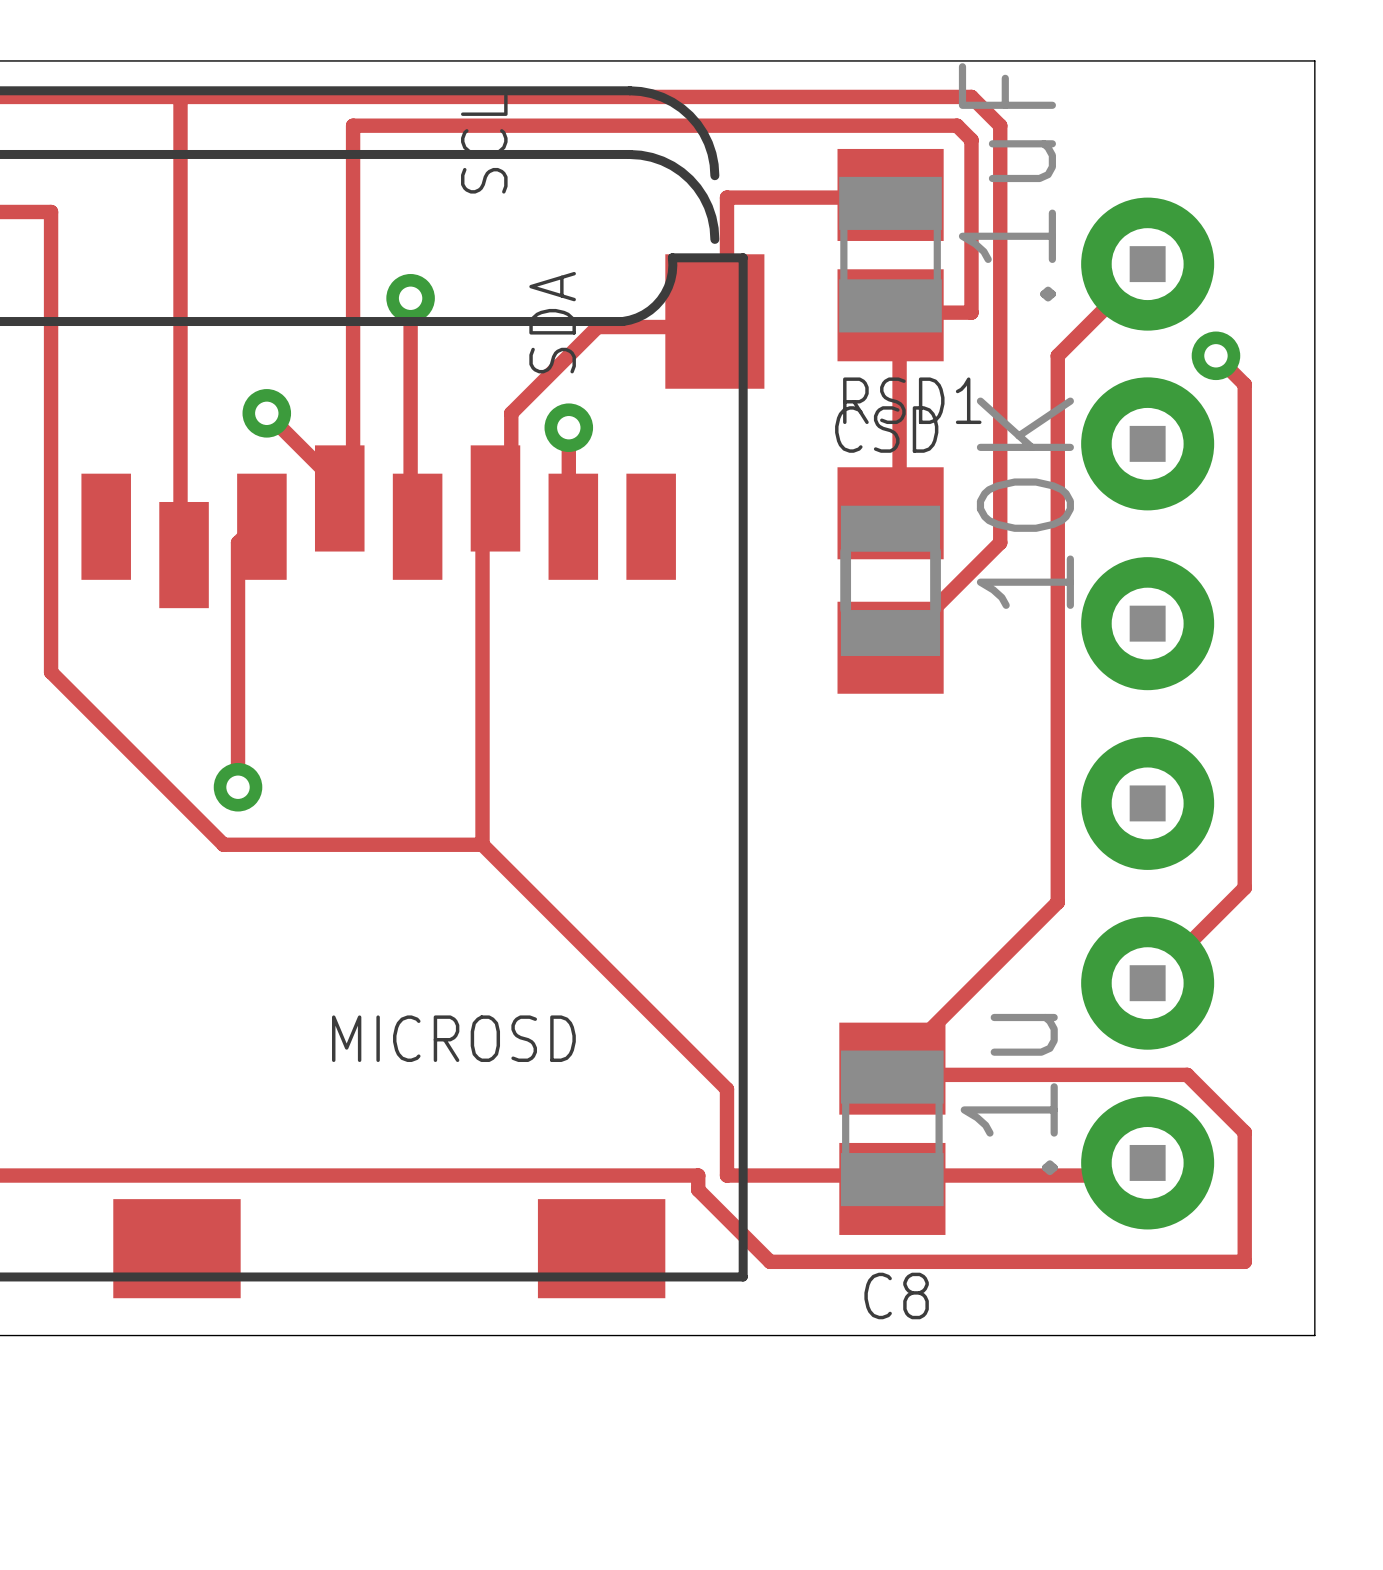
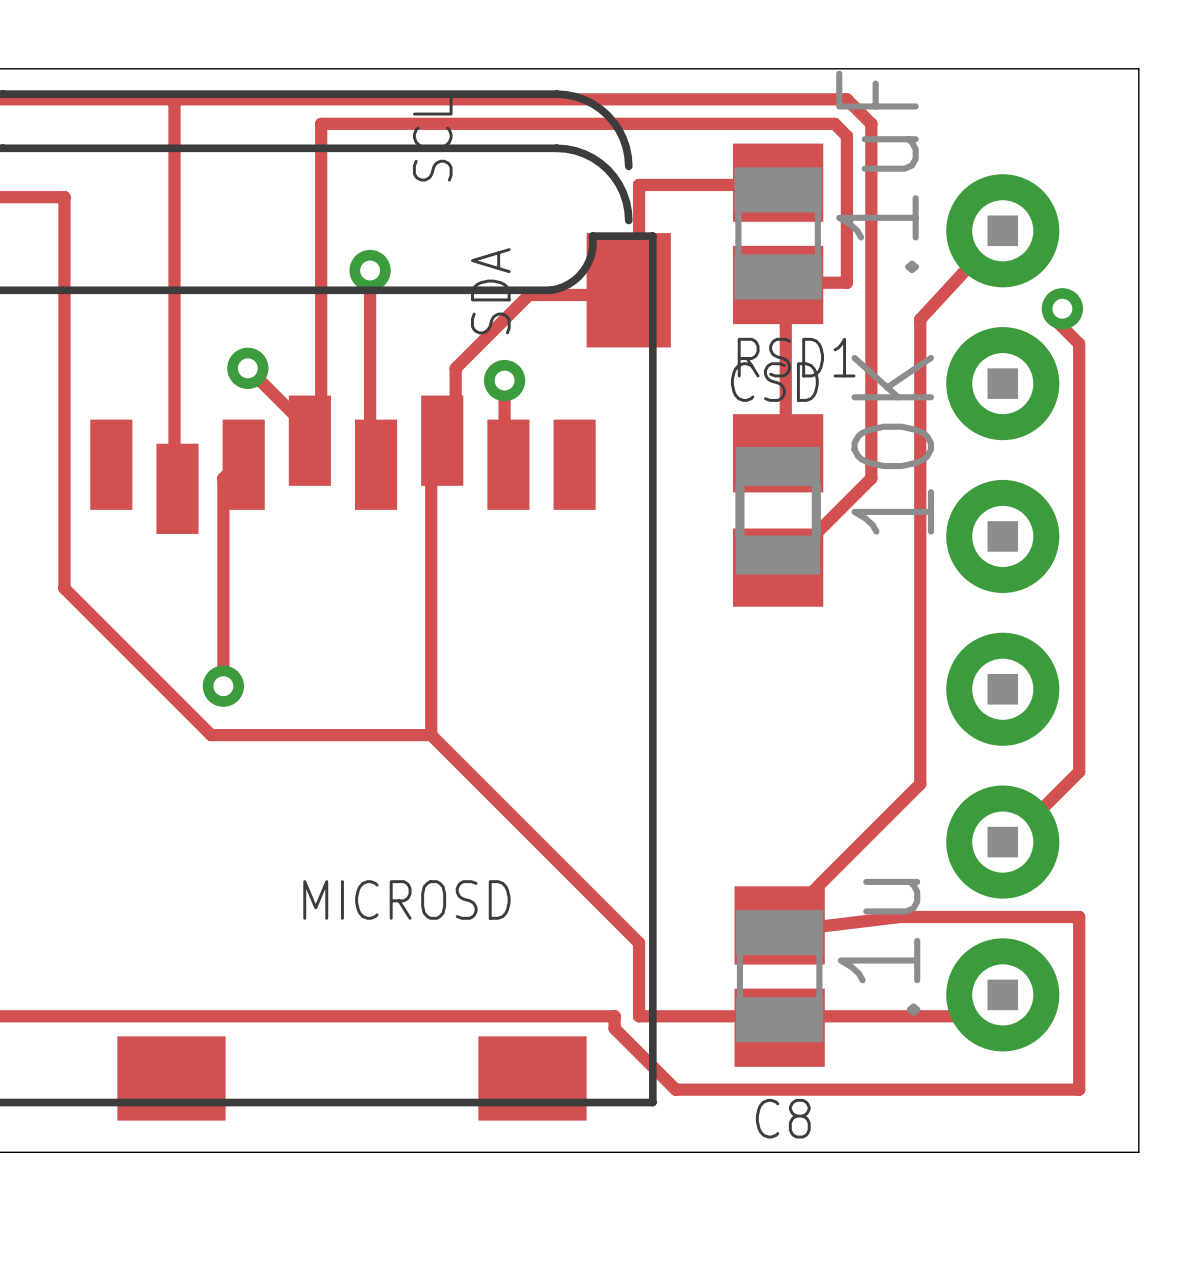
track: (1147, 264) (1057, 355) -> (1002, 230) (920, 319)
via position: (1215, 355) -> (1062, 308)
part position: (1147, 713) -> (1002, 612)
track: (899, 1074) (1187, 1074) (1244, 1132) -> (785, 930) (900, 916) (1079, 916) (1079, 979)

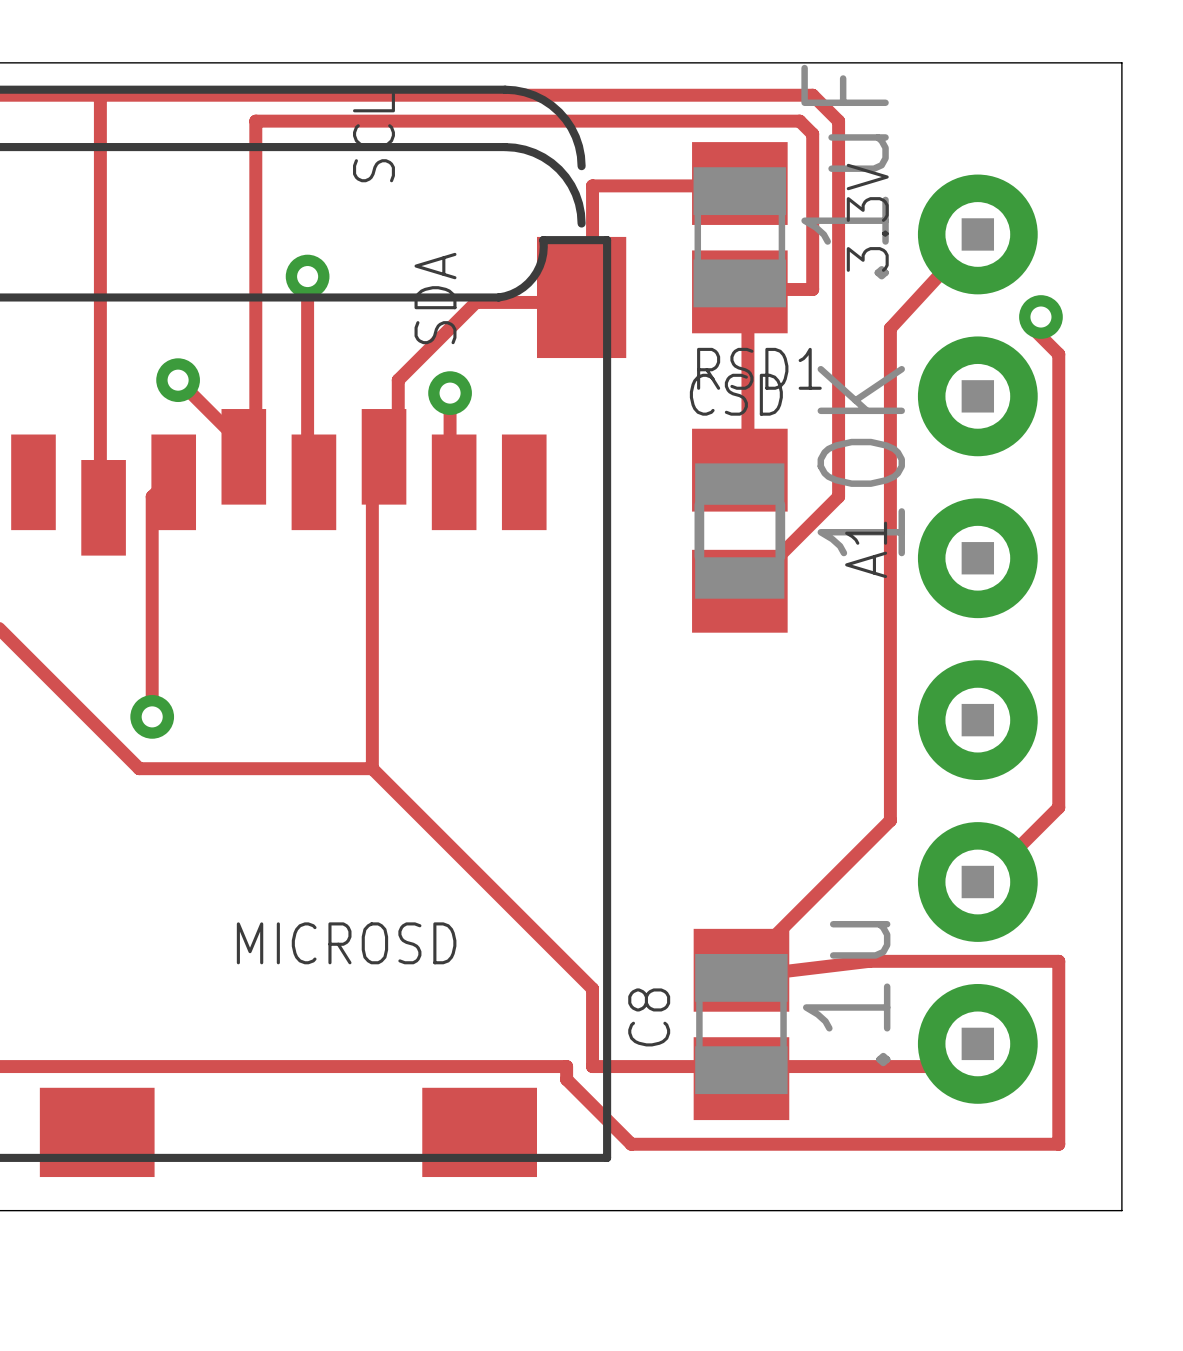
text: none -> 3.3V (867, 217)
text: none -> A1 (866, 549)
C8 name rotation: 0° (783, 1118) -> 90° counterclockwise (649, 1017)
C8 name position: C8 (783, 1118) -> C8 (649, 1017)

